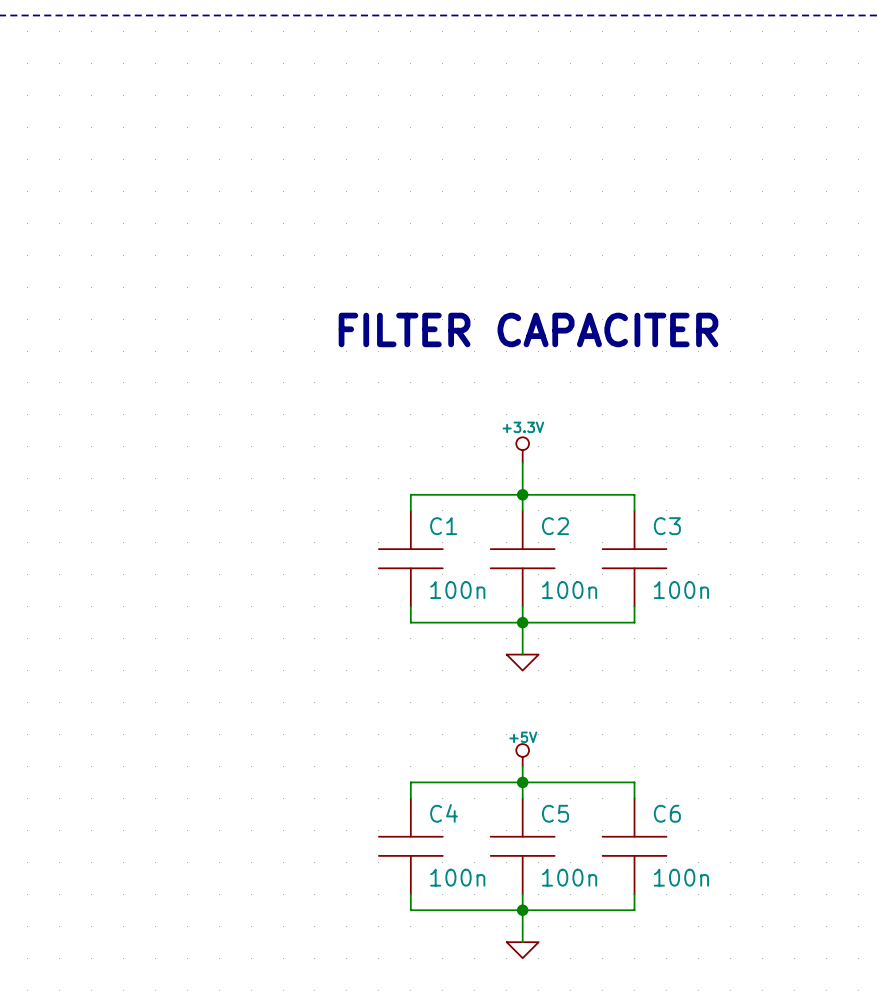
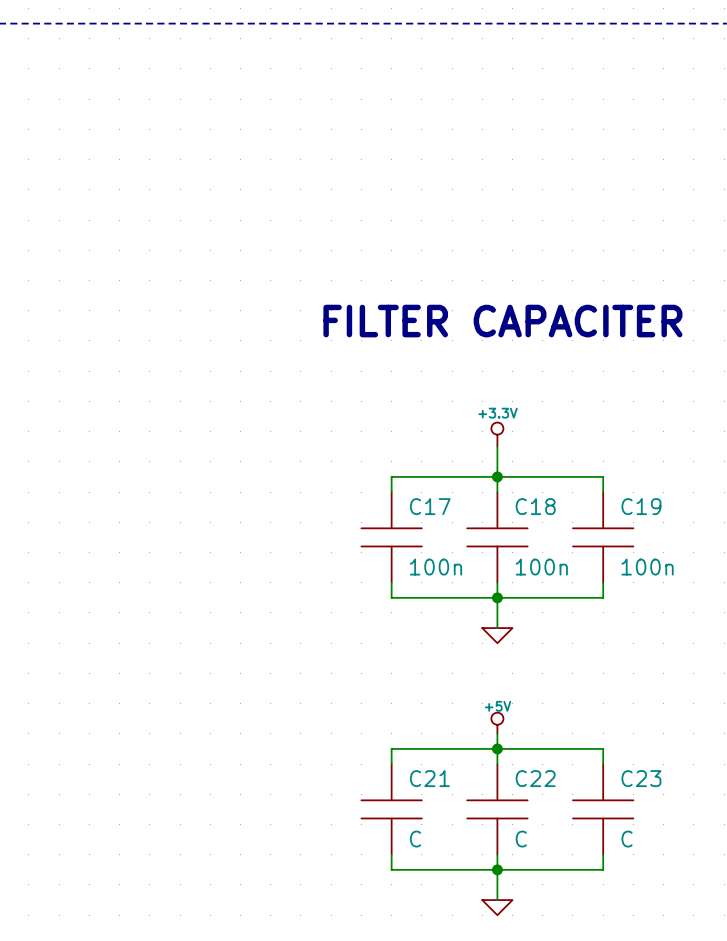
C1 name: C1 (443, 526) -> C17 (430, 506)
C2 name: C2 (555, 526) -> C18 (535, 506)
C3 name: C3 (667, 526) -> C19 (641, 506)
C4 name: C4 (444, 813) -> C21 (429, 778)
C5 name: C5 (555, 813) -> C22 (535, 778)
C6 name: C6 (667, 813) -> C23 (641, 778)
C4 value: 100n (457, 877) -> C (415, 839)
C5 value: 100n (569, 877) -> C (521, 839)
C6 value: 100n (681, 877) -> C (627, 839)

